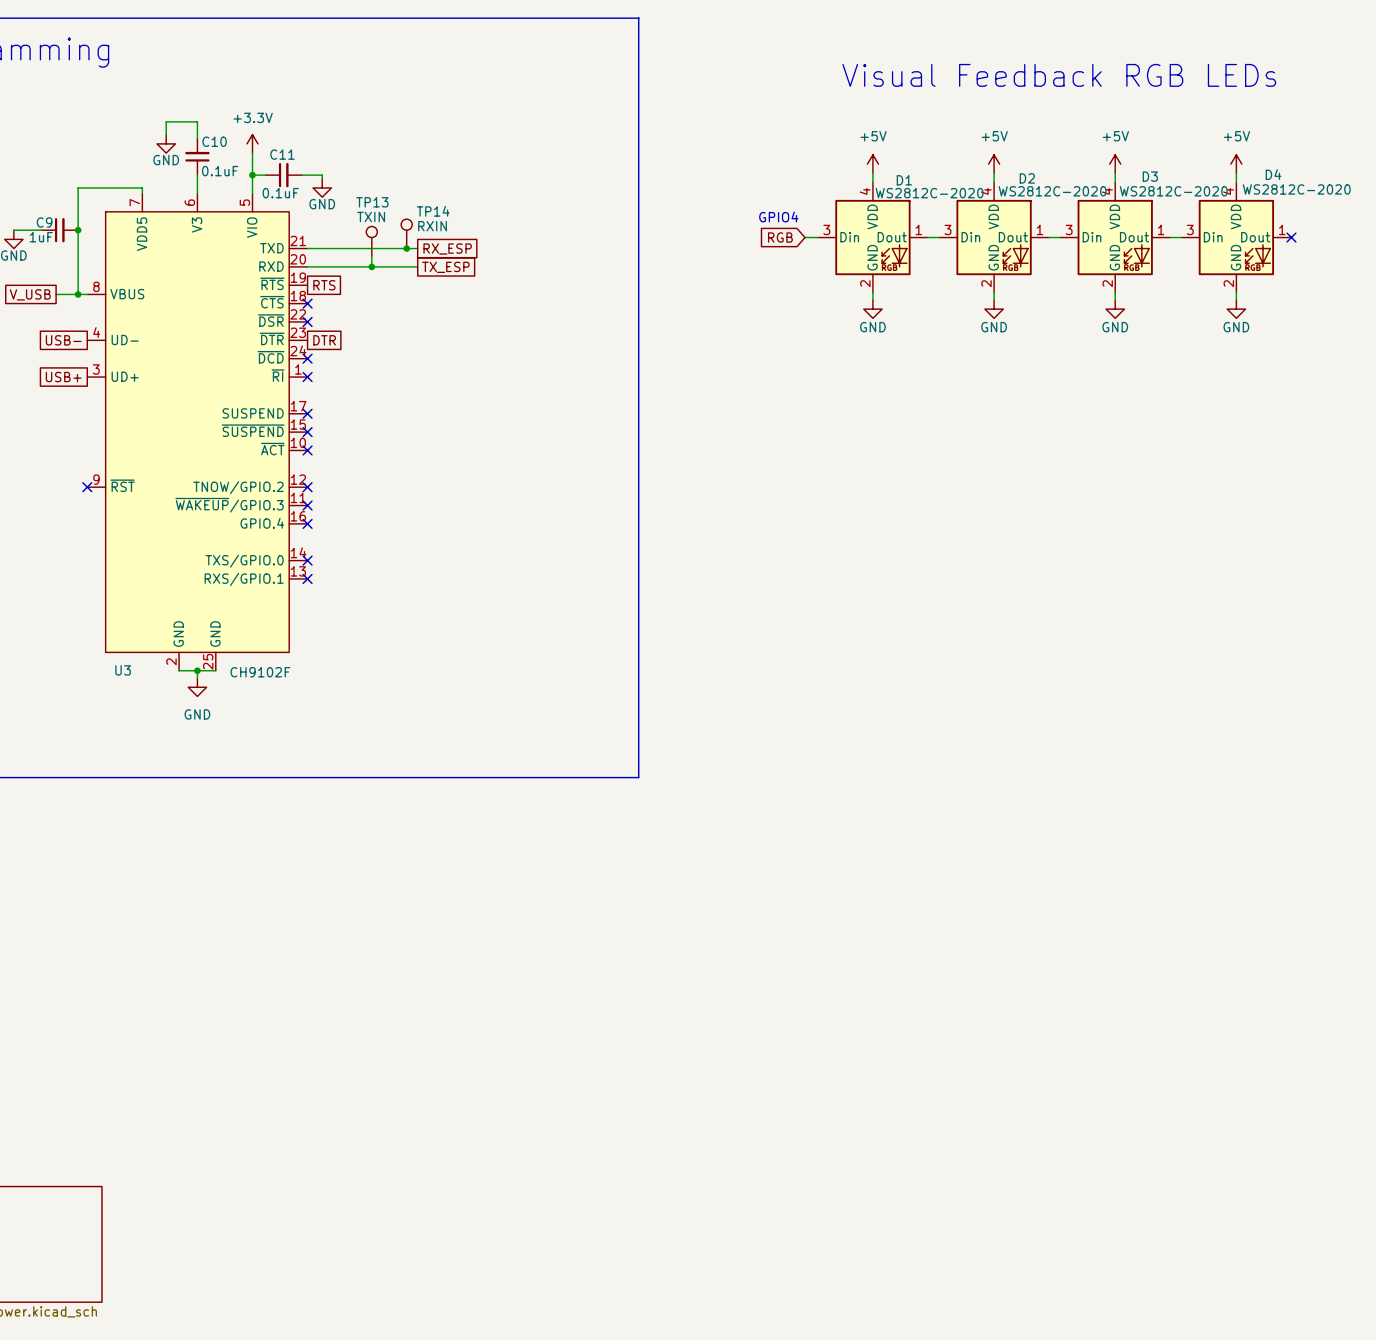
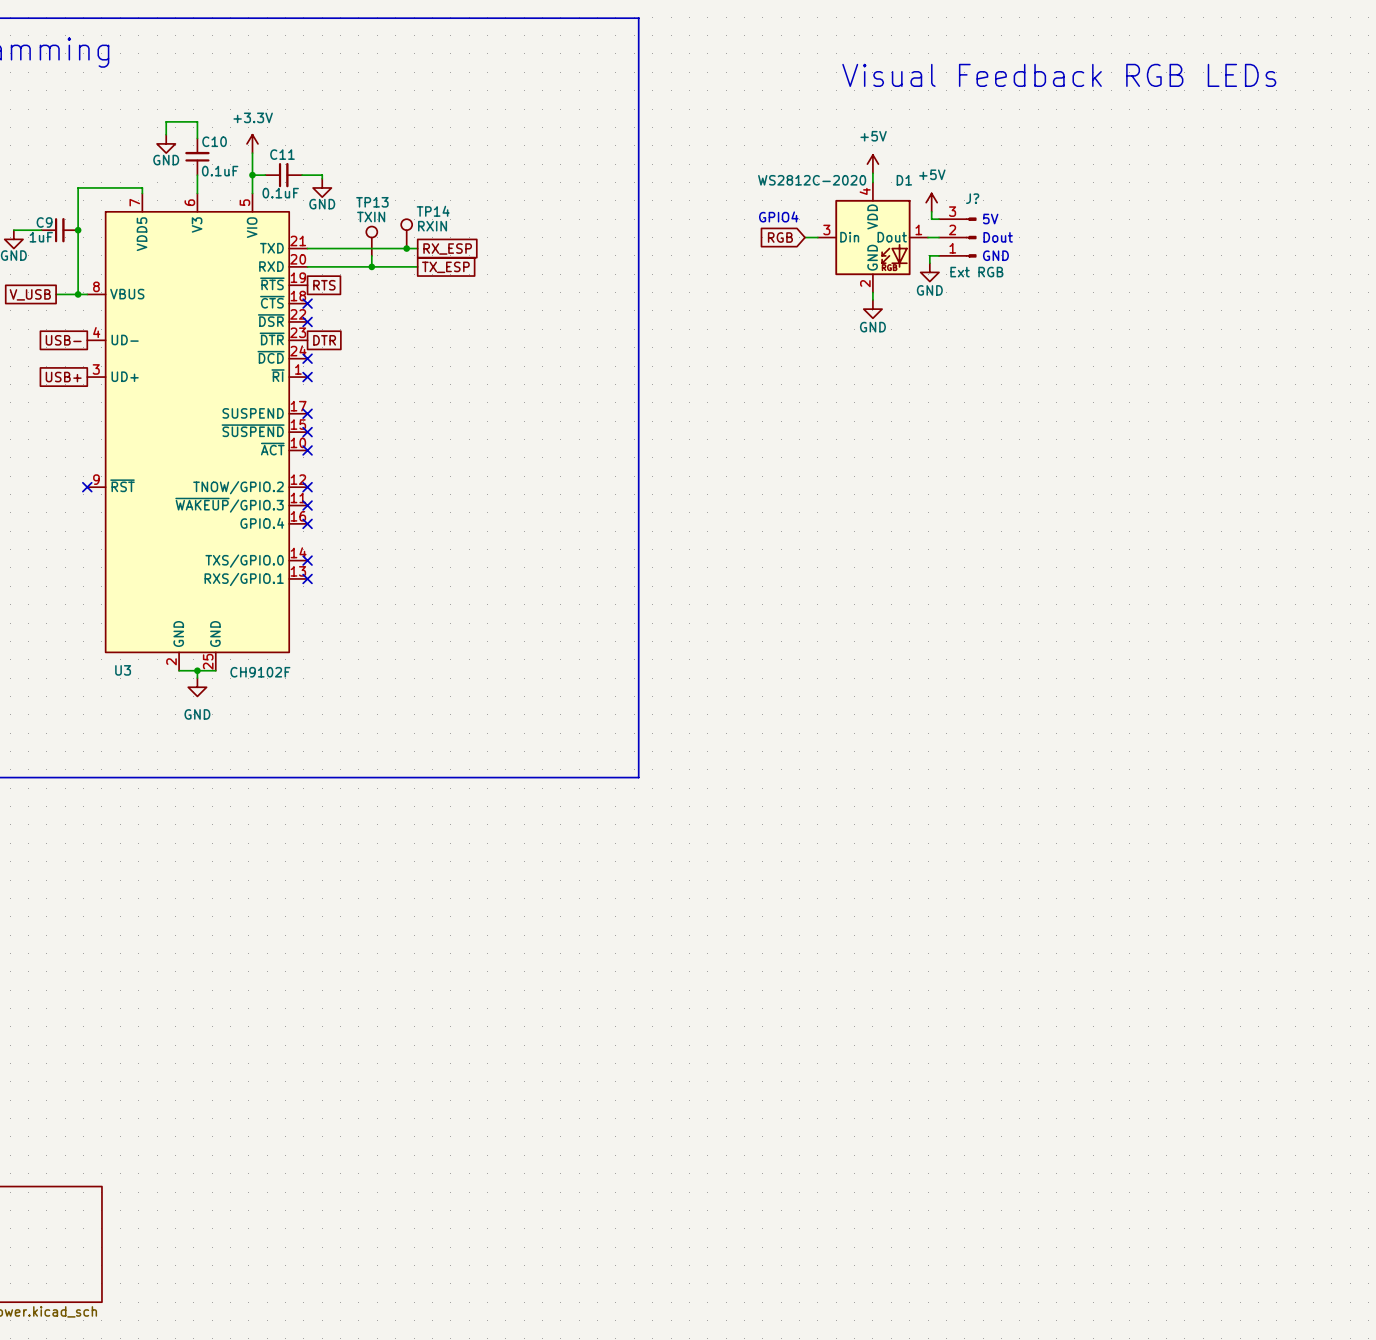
power symbol position: +5V (994, 164) -> +5V (931, 202)
power symbol: +5V (1115, 164) -> none
power symbol: +5V (1236, 164) -> none
wire: (994, 173) (994, 182) -> none
wire: (1115, 173) (1115, 182) -> none
wire: (1236, 173) (1236, 182) -> none
D1 value position: WS2812C-2020 (929, 193) -> WS2812C-2020 (812, 180)
wire: none -> (931, 211) (931, 219) (939, 219)
text: none -> 5V (990, 219)
J?: none -> Ext RGB (957, 237)
D2: WS2812C-2020 (994, 237) -> none
text: none -> Dout (998, 237)
wire: (1049, 237) (1060, 237) -> none
D3: WS2812C-2020 (1115, 237) -> none
wire: (1170, 237) (1181, 237) -> none
D4: WS2812C-2020 (1236, 237) -> none
no-connect mark: (1291, 237) -> none
wire: none -> (939, 255) (929, 255) (929, 263)
text: none -> GND (995, 255)
wire: (994, 292) (994, 299) -> none
wire: (1115, 292) (1115, 299) -> none
wire: (1236, 292) (1236, 299) -> none
power symbol position: GND (994, 309) -> GND (929, 272)
power symbol: GND (1115, 309) -> none
power symbol: GND (1236, 309) -> none

